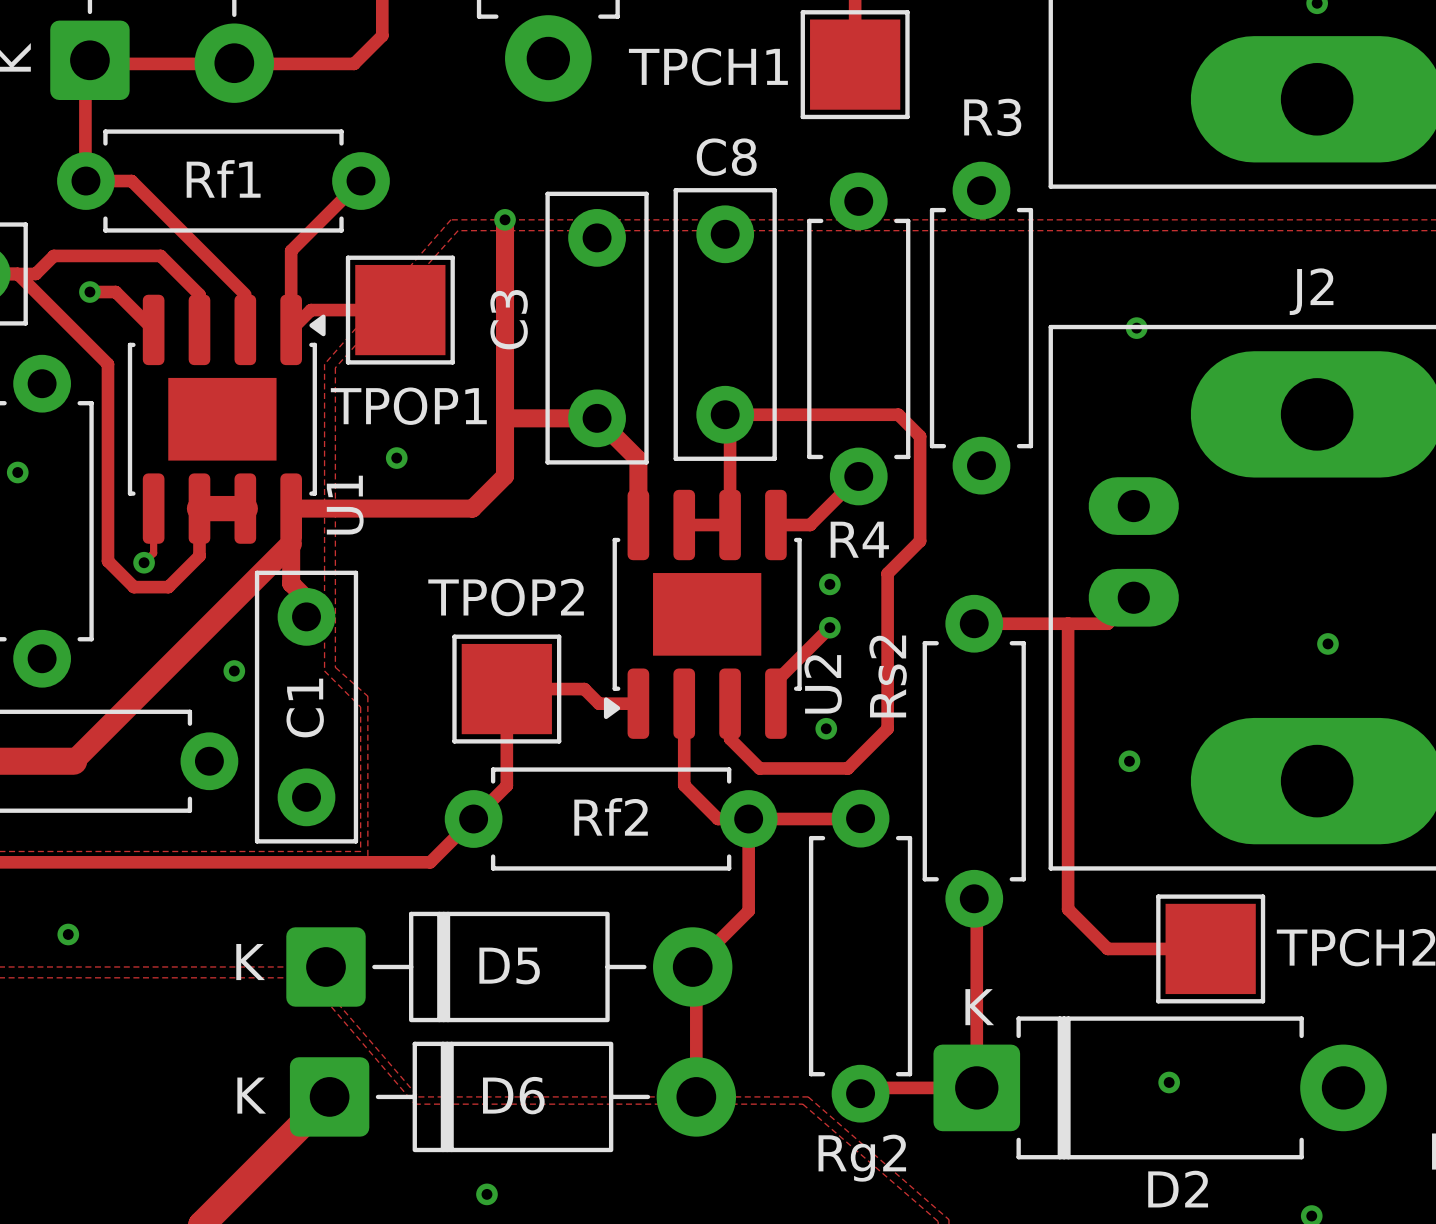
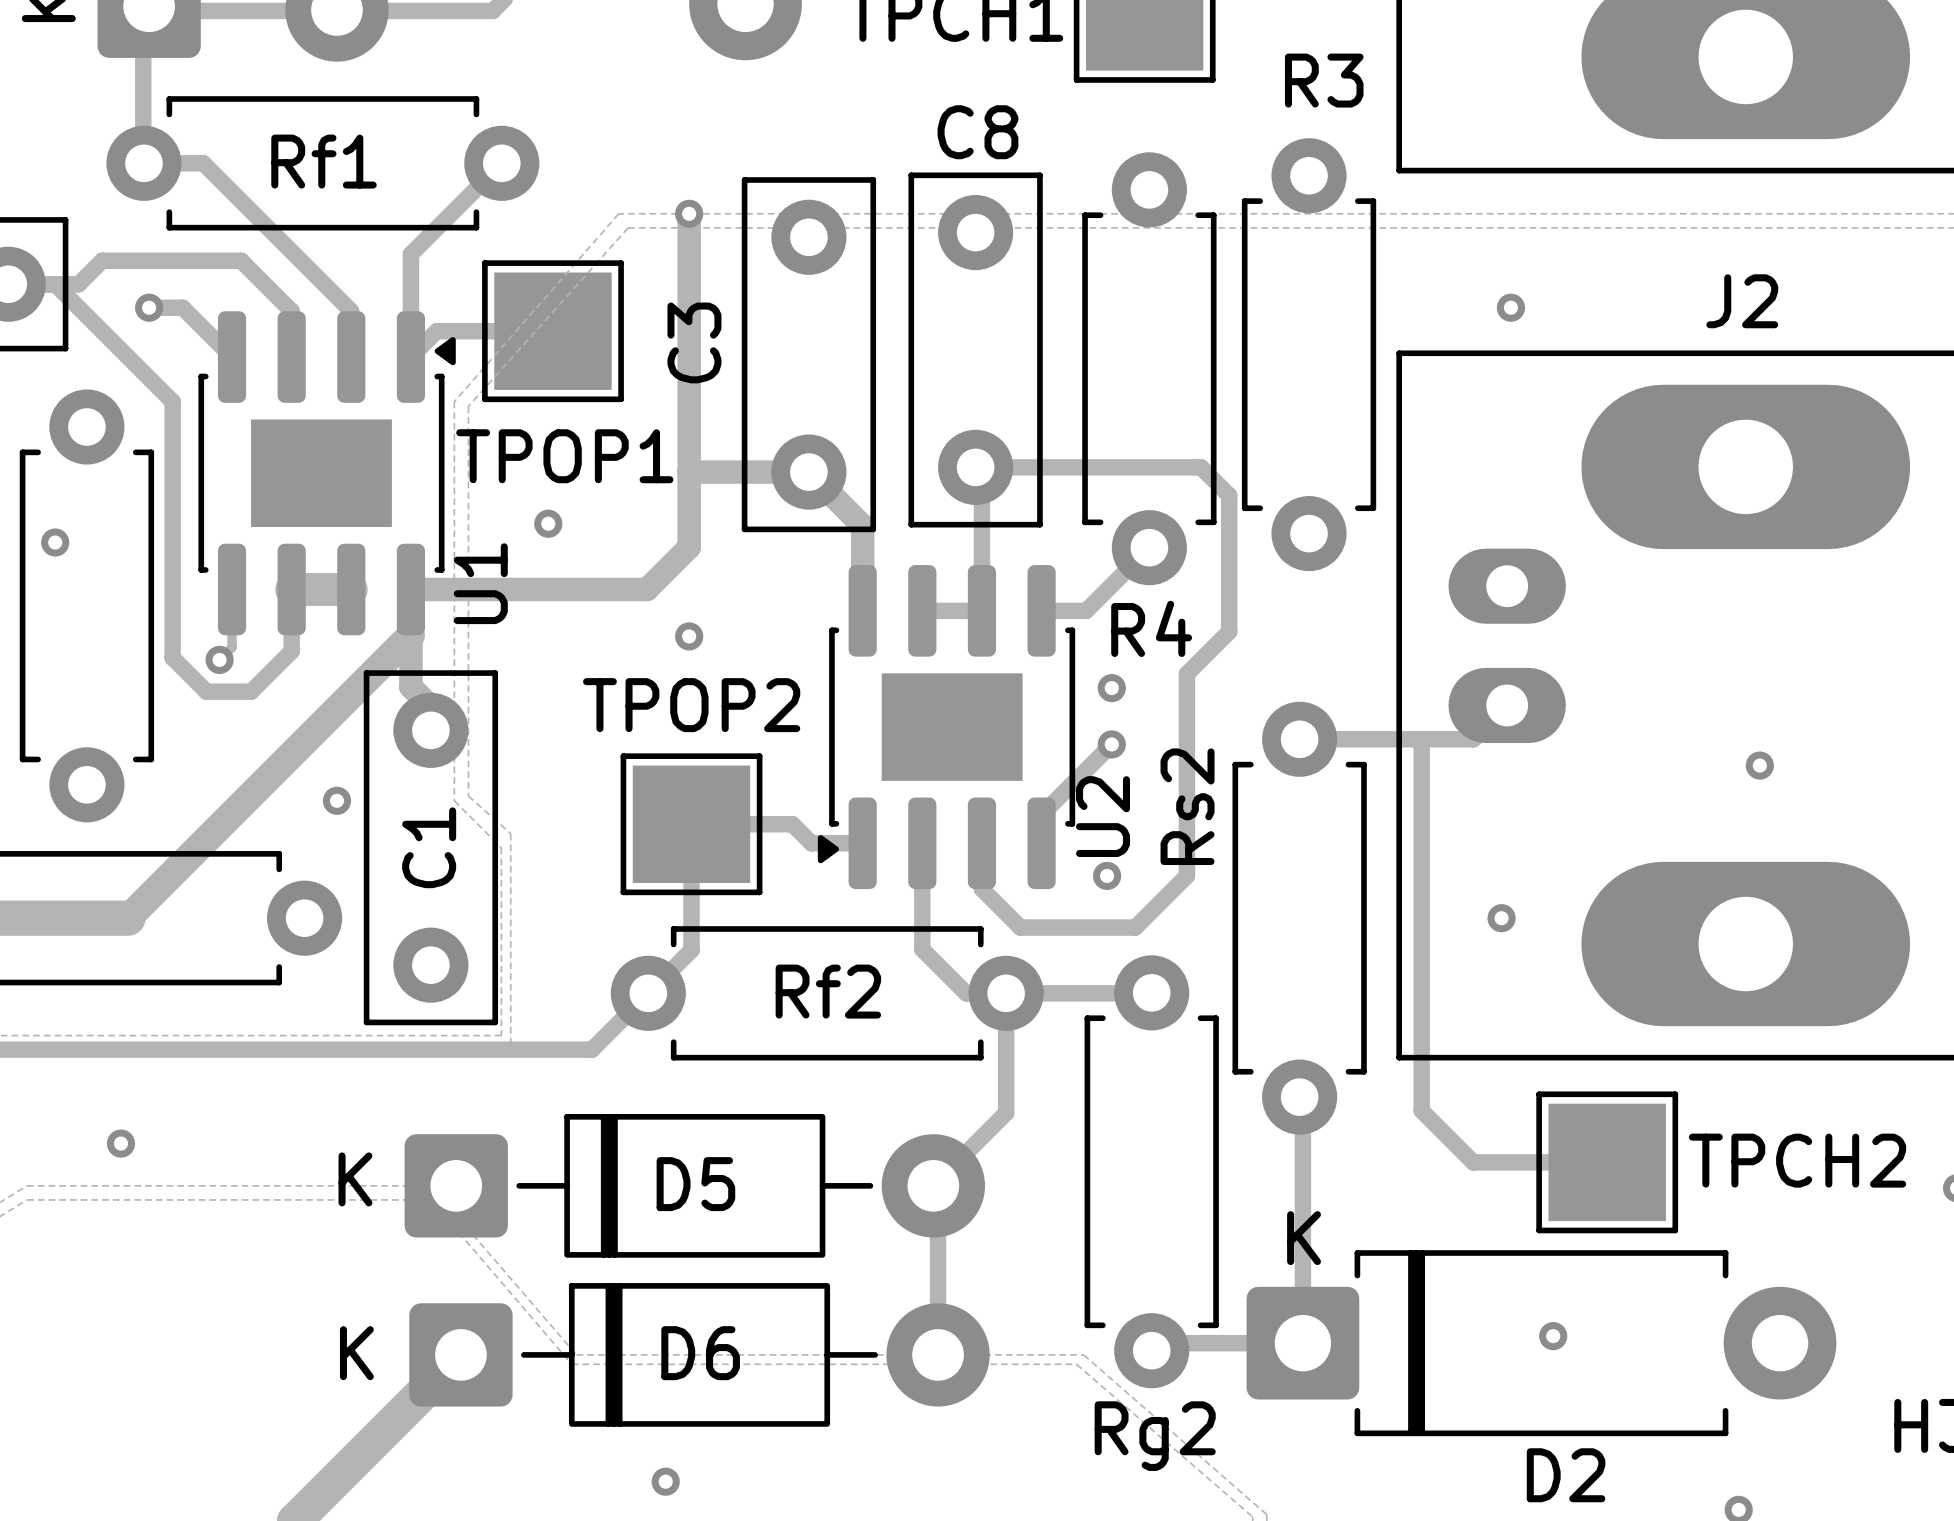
via position: (1136, 328) -> (1510, 307)
via: none -> (689, 636)

